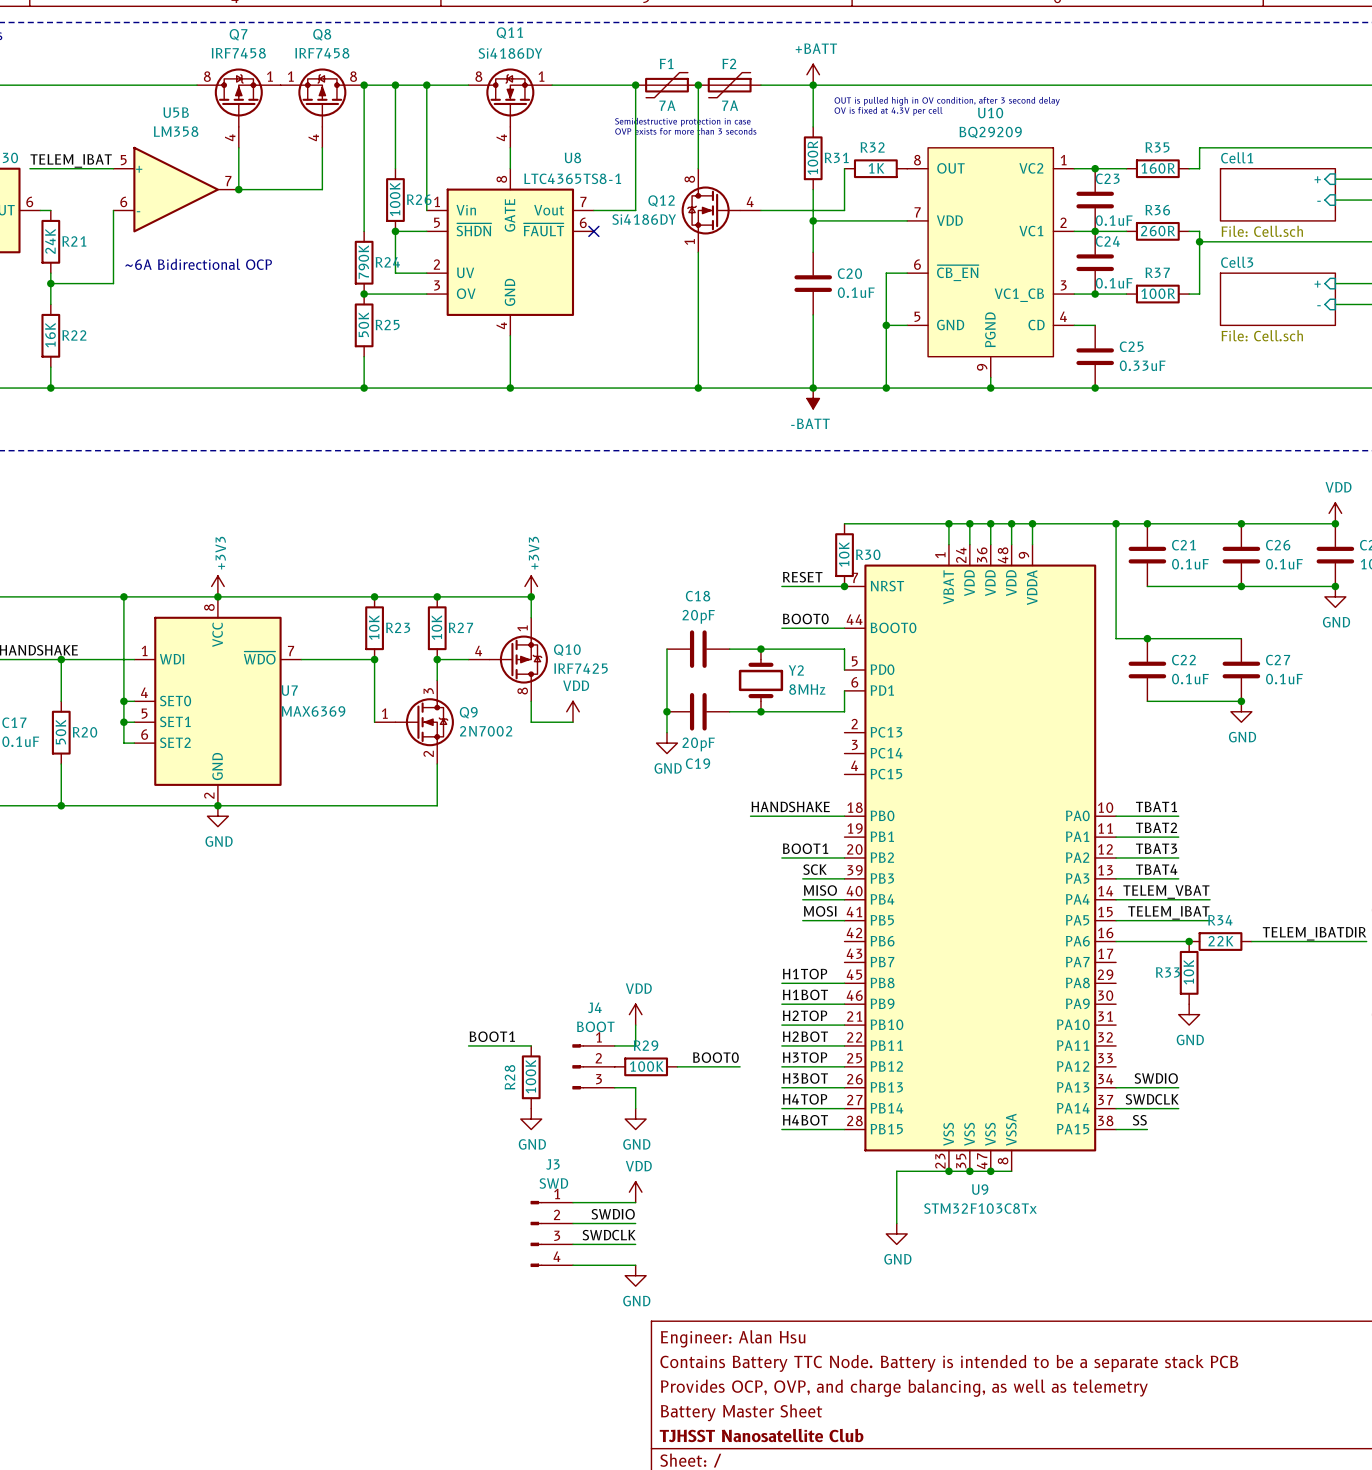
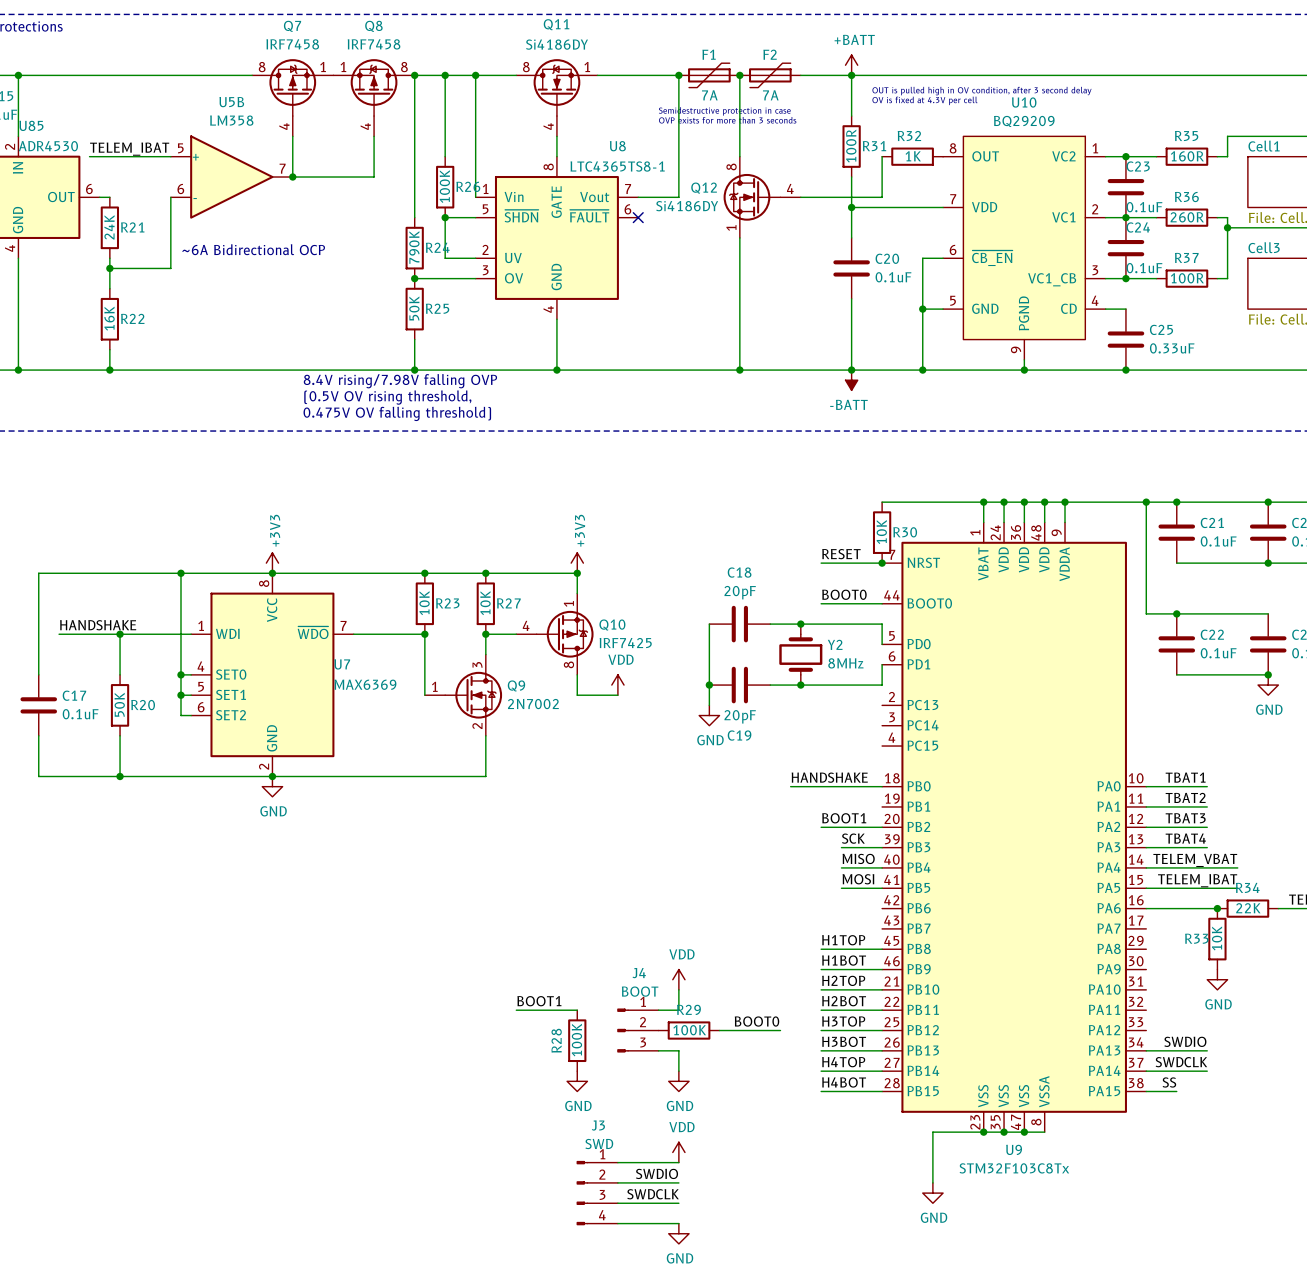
text: none -> 8.4V rising/7.98V falling OVP (400, 381)
text: none -> (0.5V OV rising threshold, (387, 397)
text: none -> 0.475V OV falling threshold) (397, 413)

